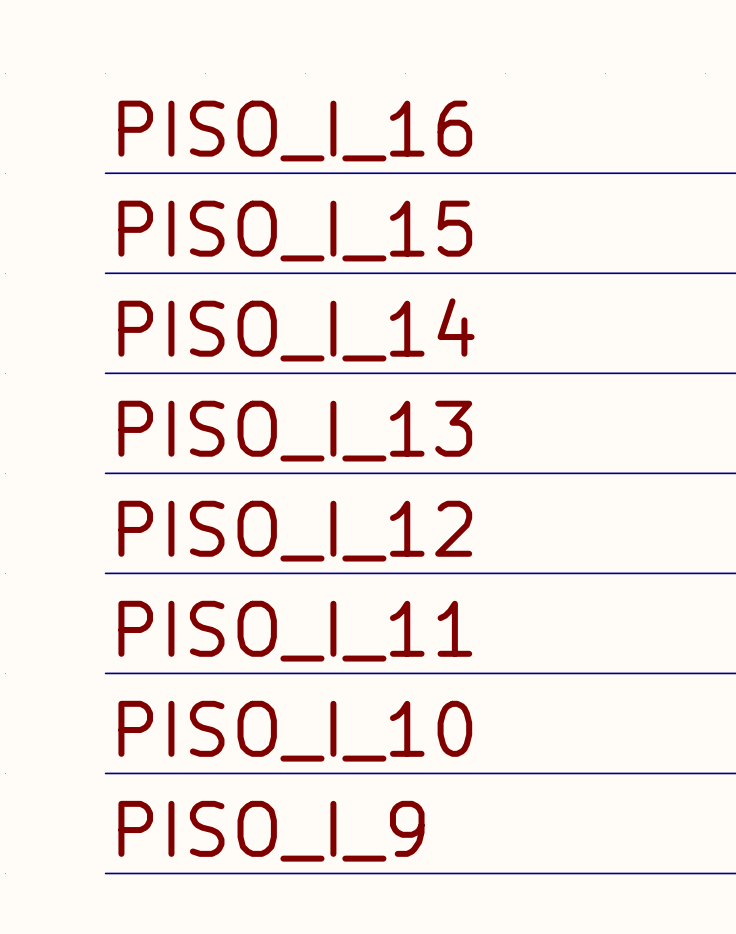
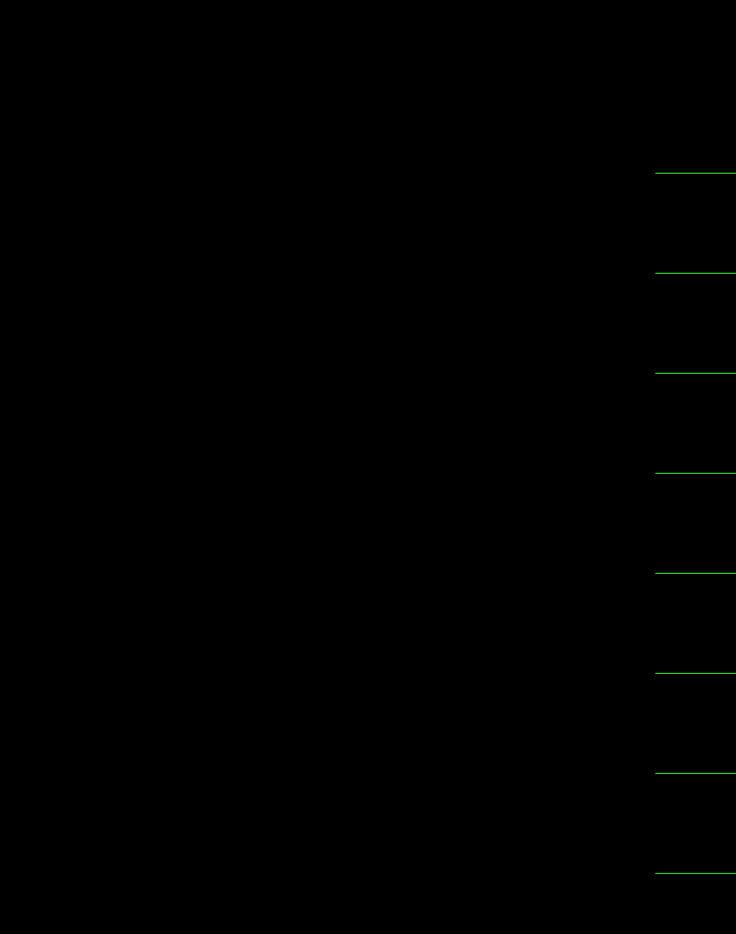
label: PISO_I_16 (295, 131) -> none
wire: (105, 173) (655, 173) -> none
label: PISO_I_15 (295, 231) -> none
wire: (105, 273) (655, 273) -> none
label: PISO_I_14 (296, 329) -> none
wire: (105, 373) (655, 373) -> none
label: PISO_I_13 (295, 431) -> none
wire: (105, 473) (655, 473) -> none
label: PISO_I_12 (295, 531) -> none
wire: (105, 573) (655, 573) -> none
label: PISO_I_11 (295, 631) -> none
wire: (105, 673) (655, 673) -> none
label: PISO_I_10 (295, 731) -> none
wire: (105, 773) (655, 773) -> none
label: PISO_I_9 (271, 831) -> none
wire: (105, 873) (655, 873) -> none

